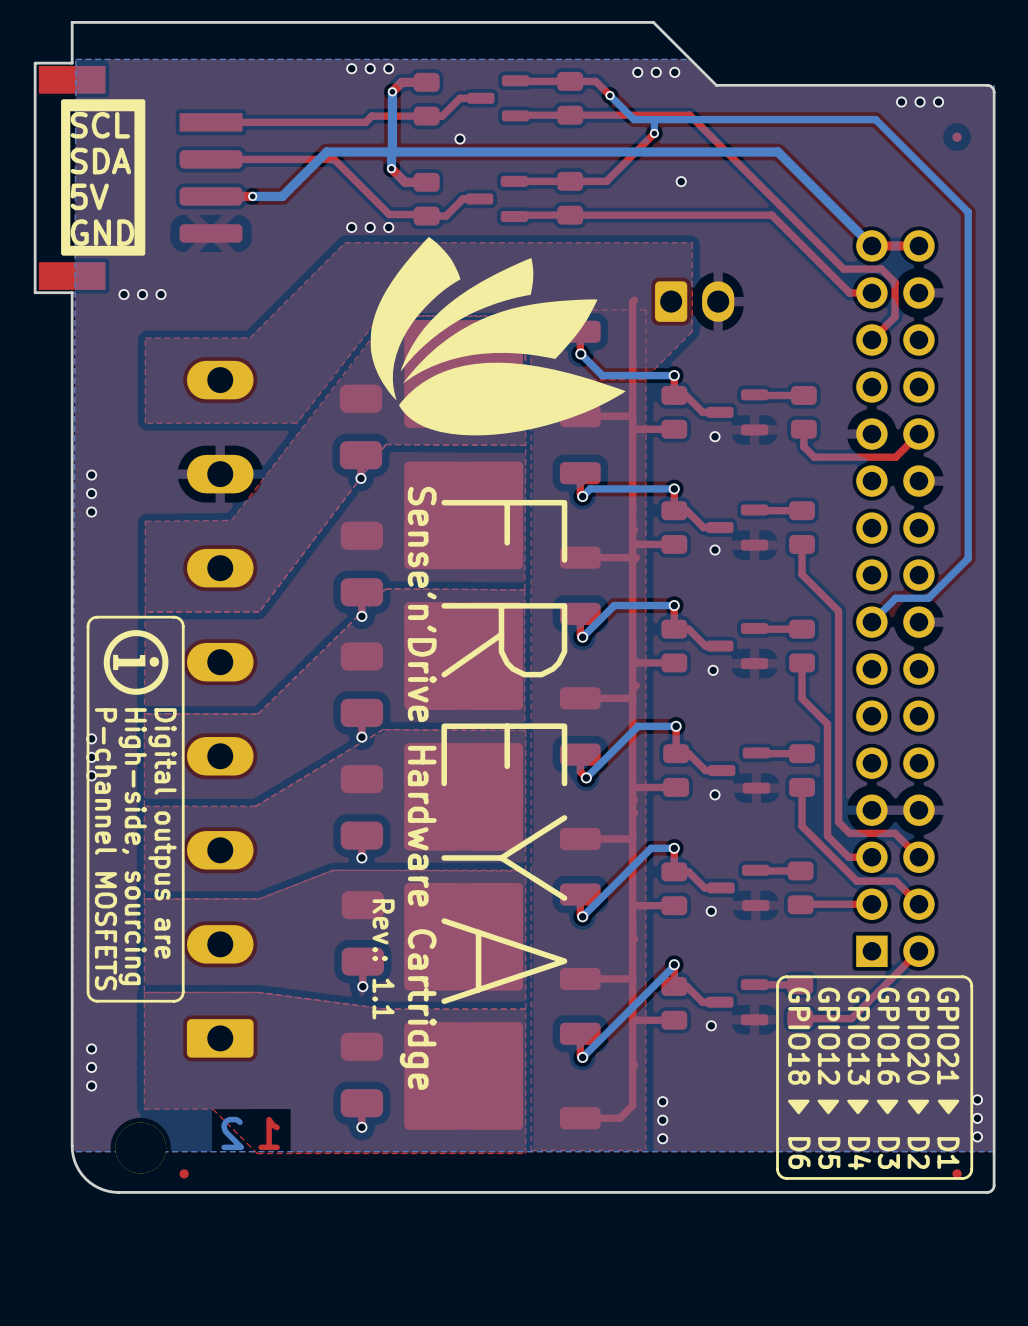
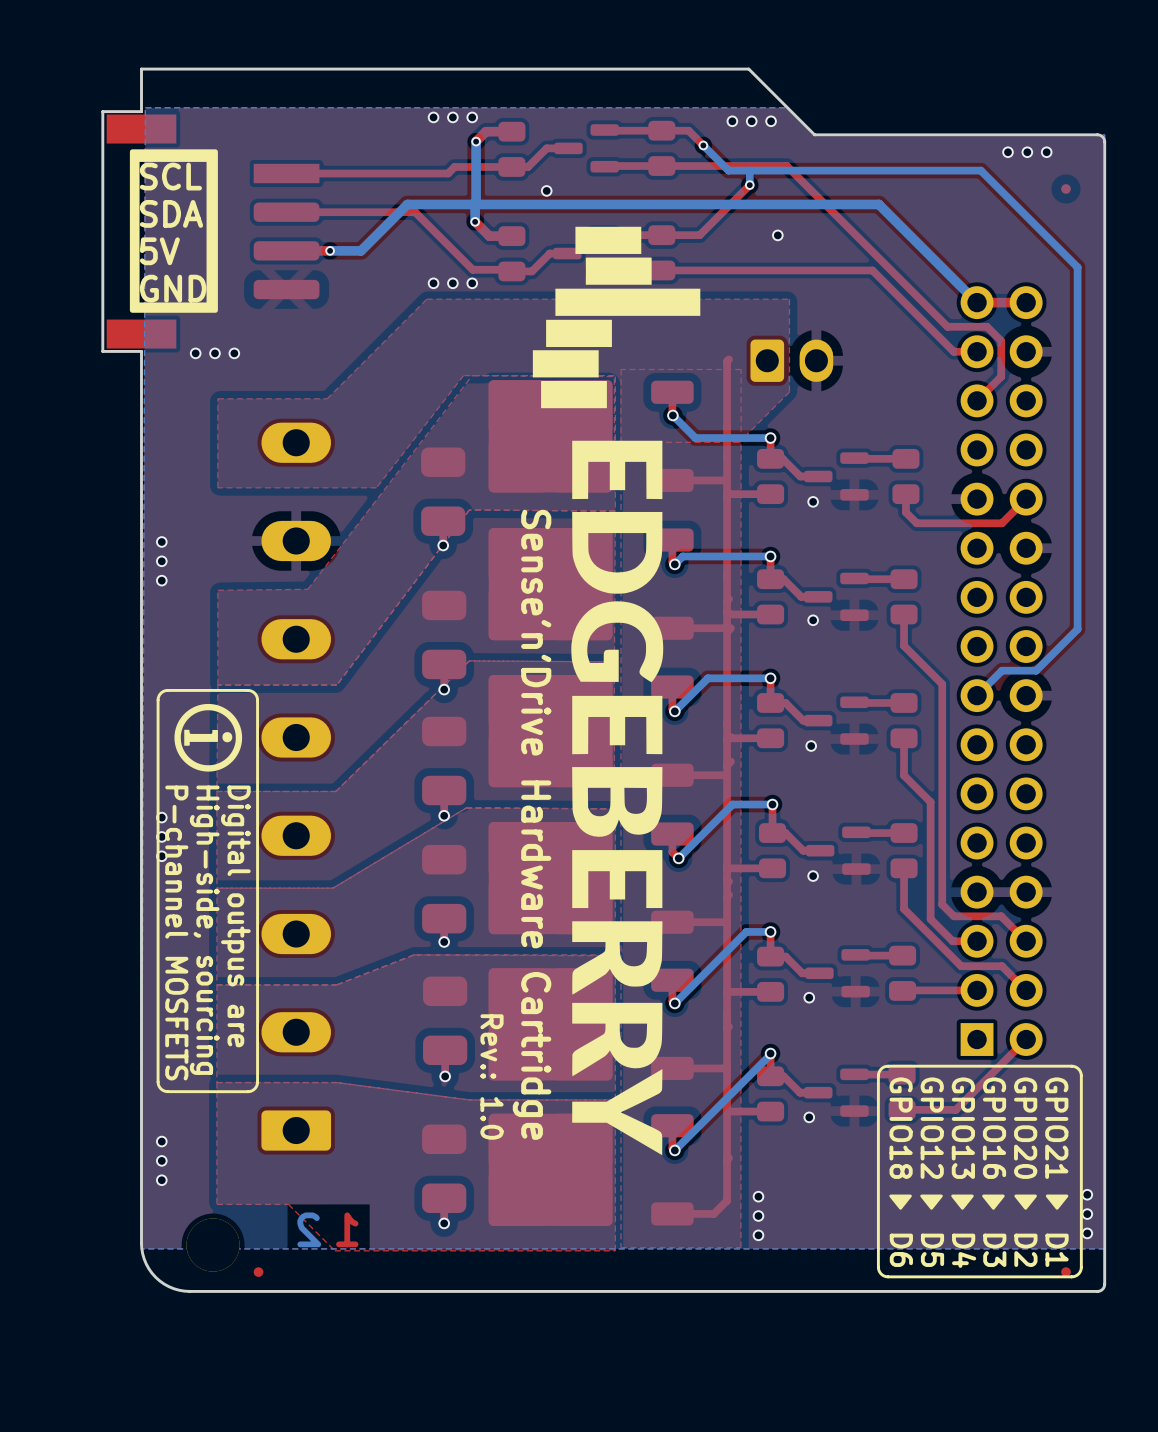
drawing: none -> [532, 226, 701, 1156]
drawing: [370, 236, 626, 436] -> none
text: FREYA (504, 751) -> none
text position: Sense'n'Drive Hardware Cartridge (418, 788) -> Sense'n'Drive Hardware Cartridge (532, 824)
text: Rev.: 1.1 (383, 959) -> Rev.: 1.0 (492, 1076)

